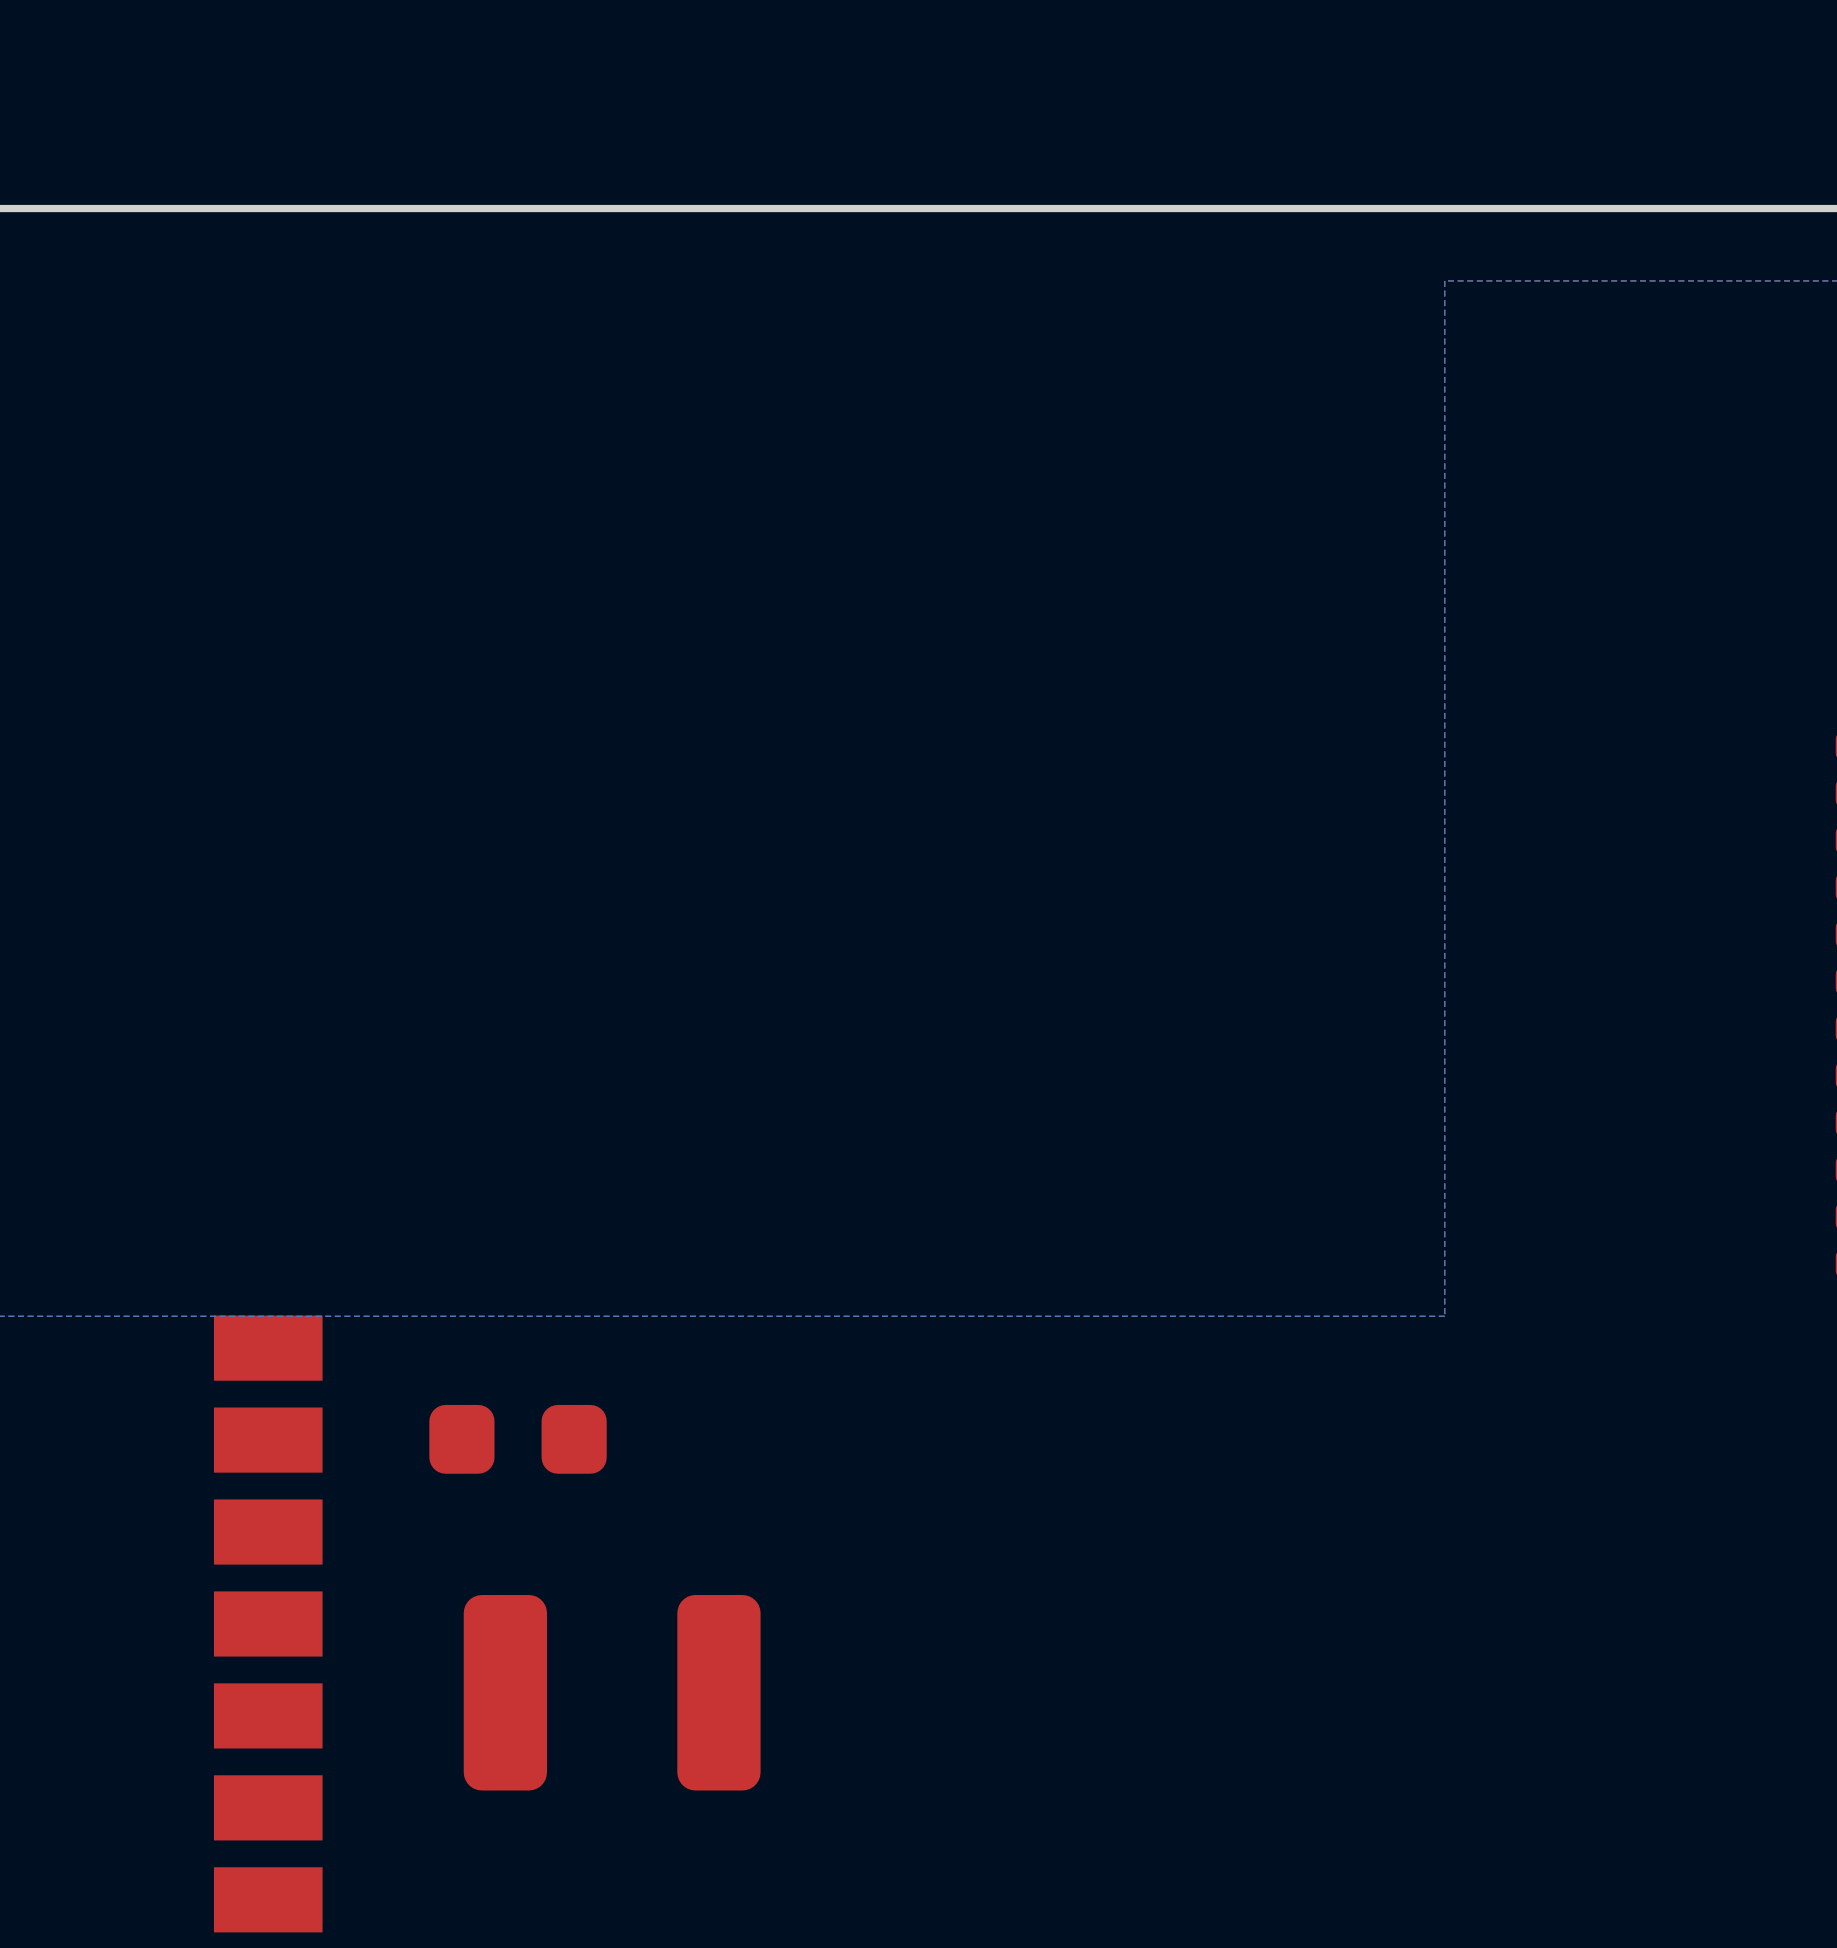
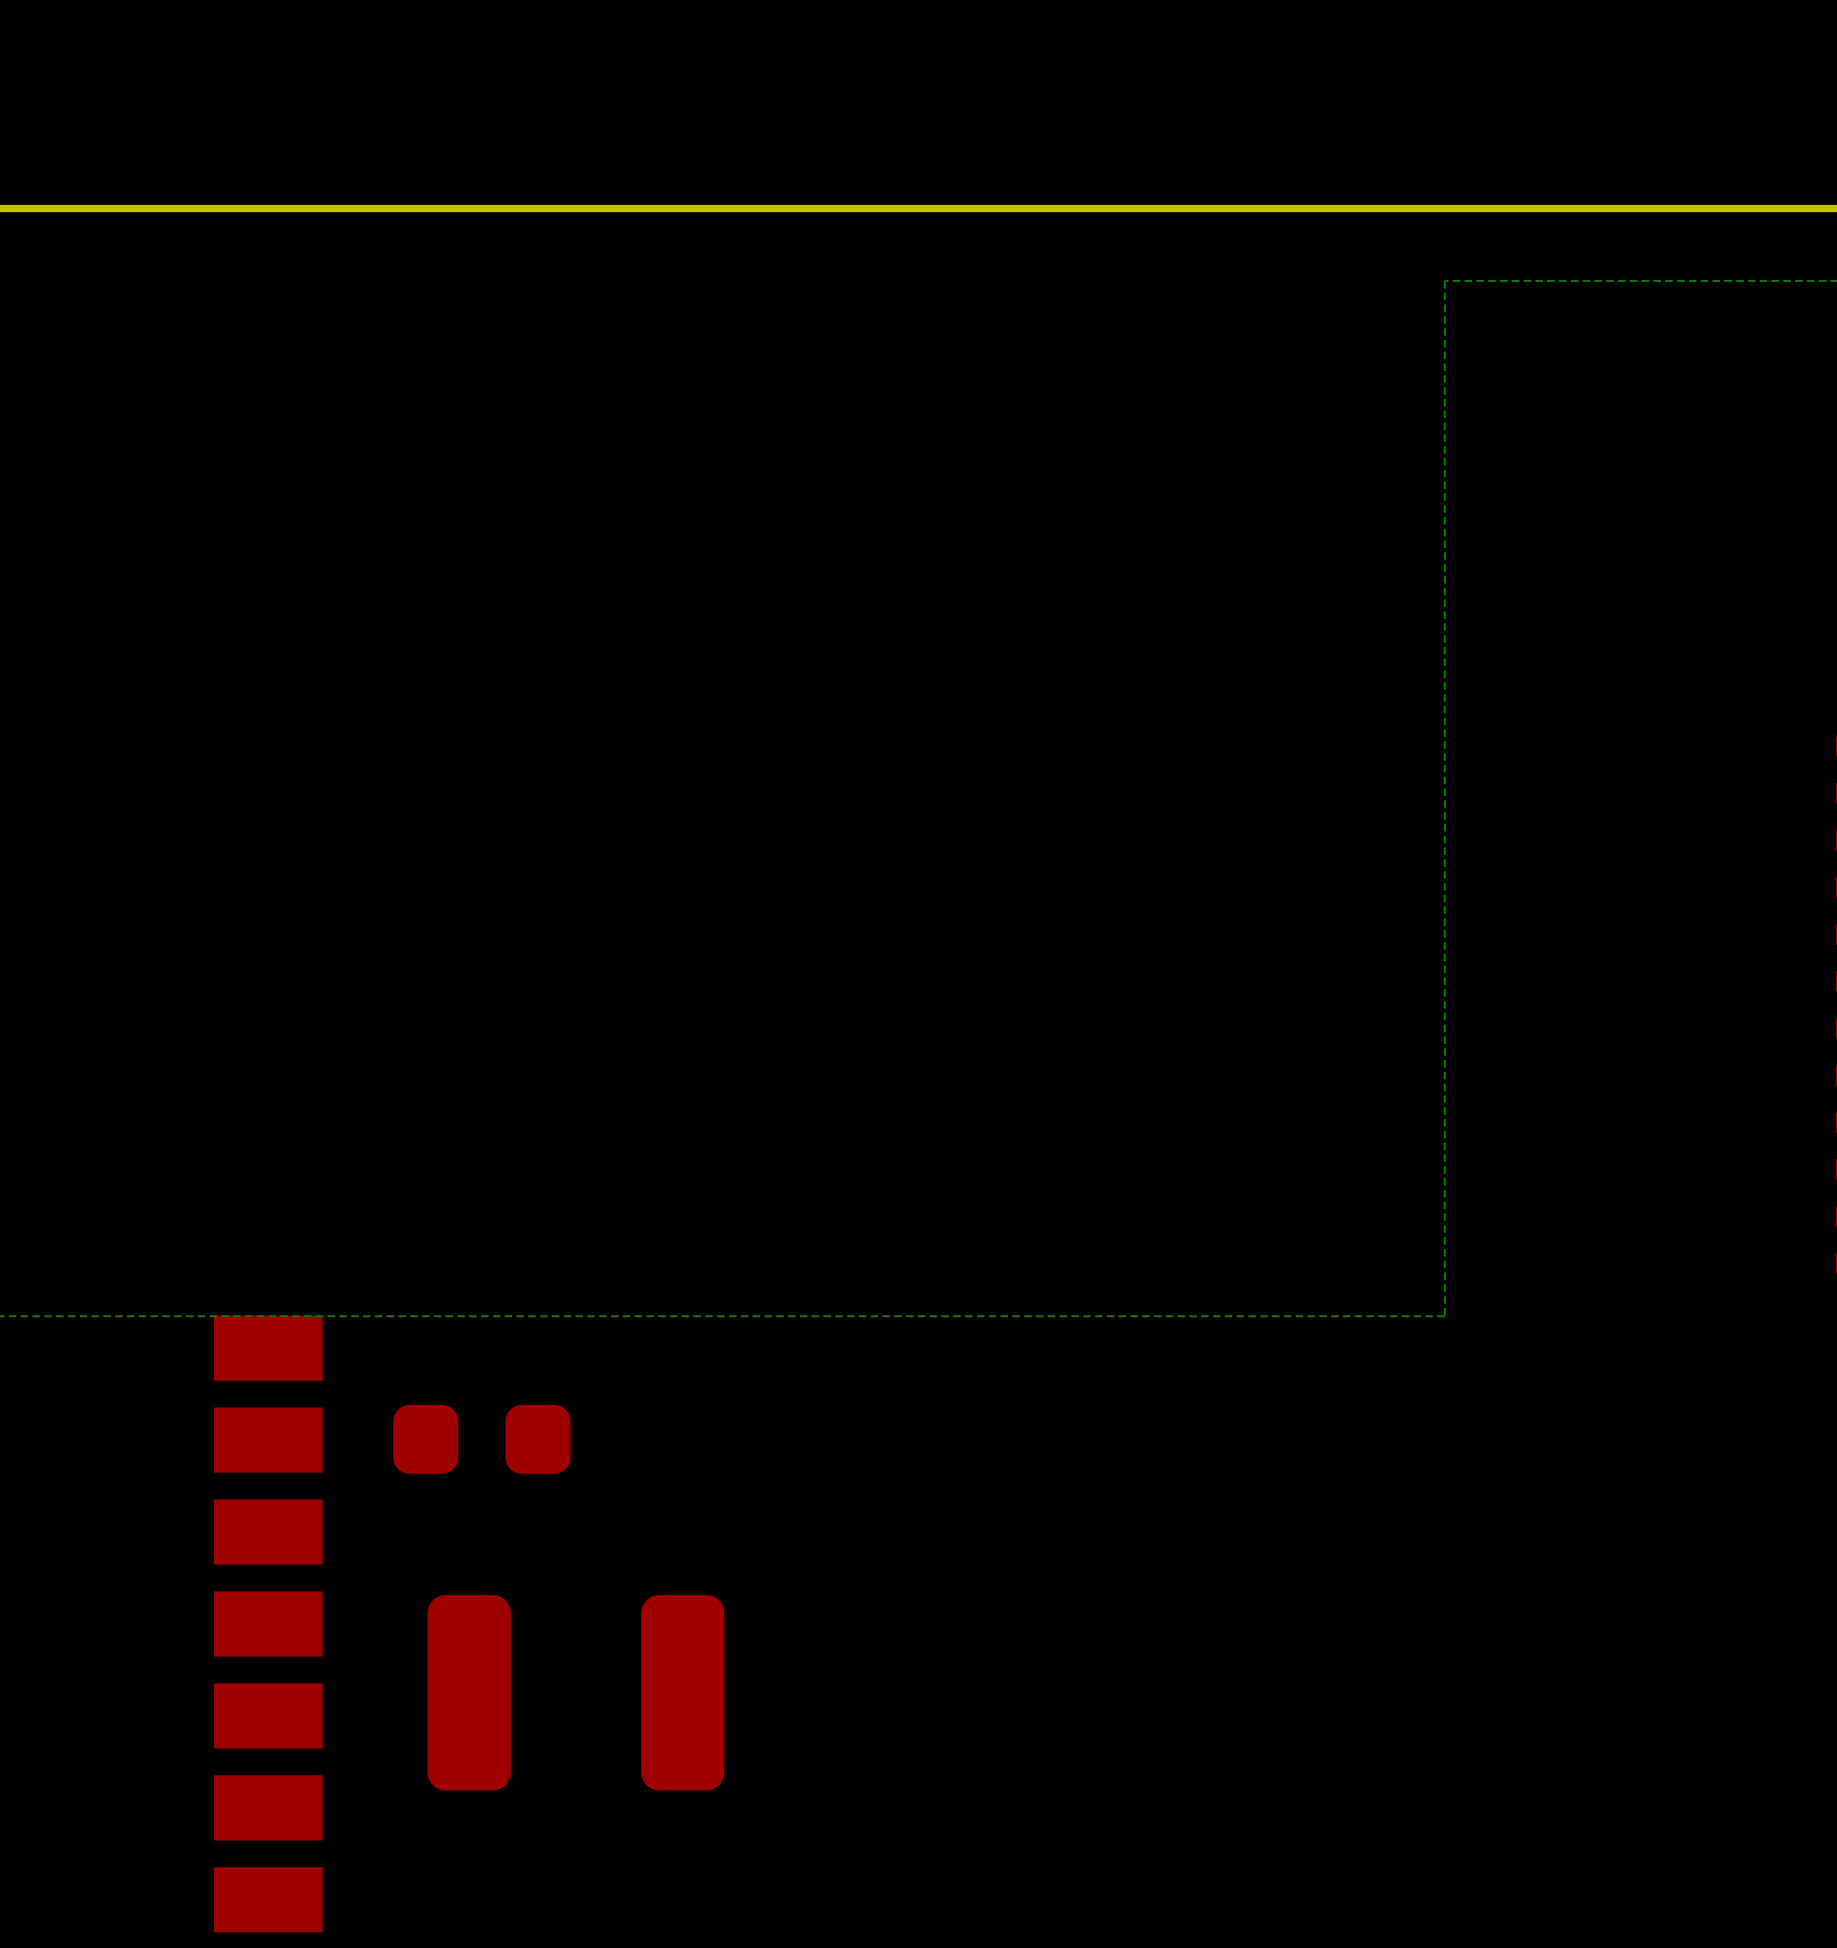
part position: (518, 1439) -> (481, 1439)
part position: (612, 1692) -> (575, 1692)

